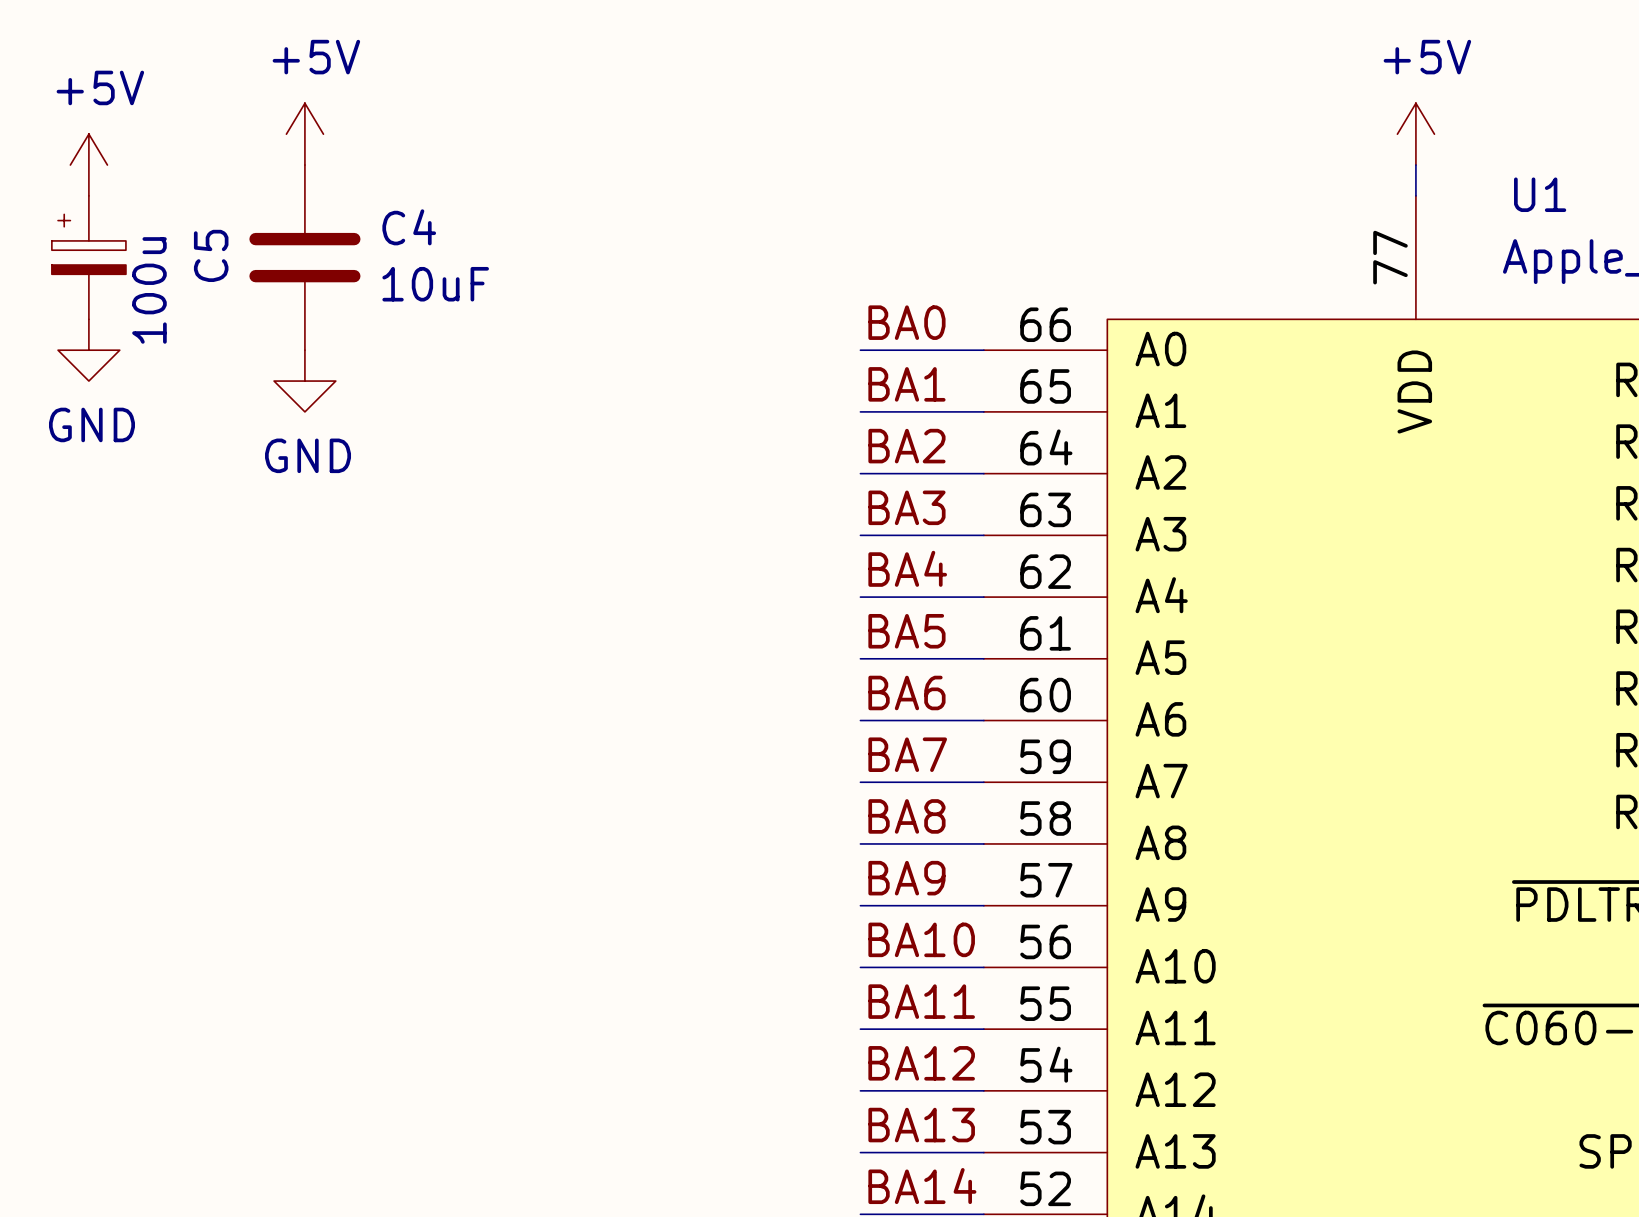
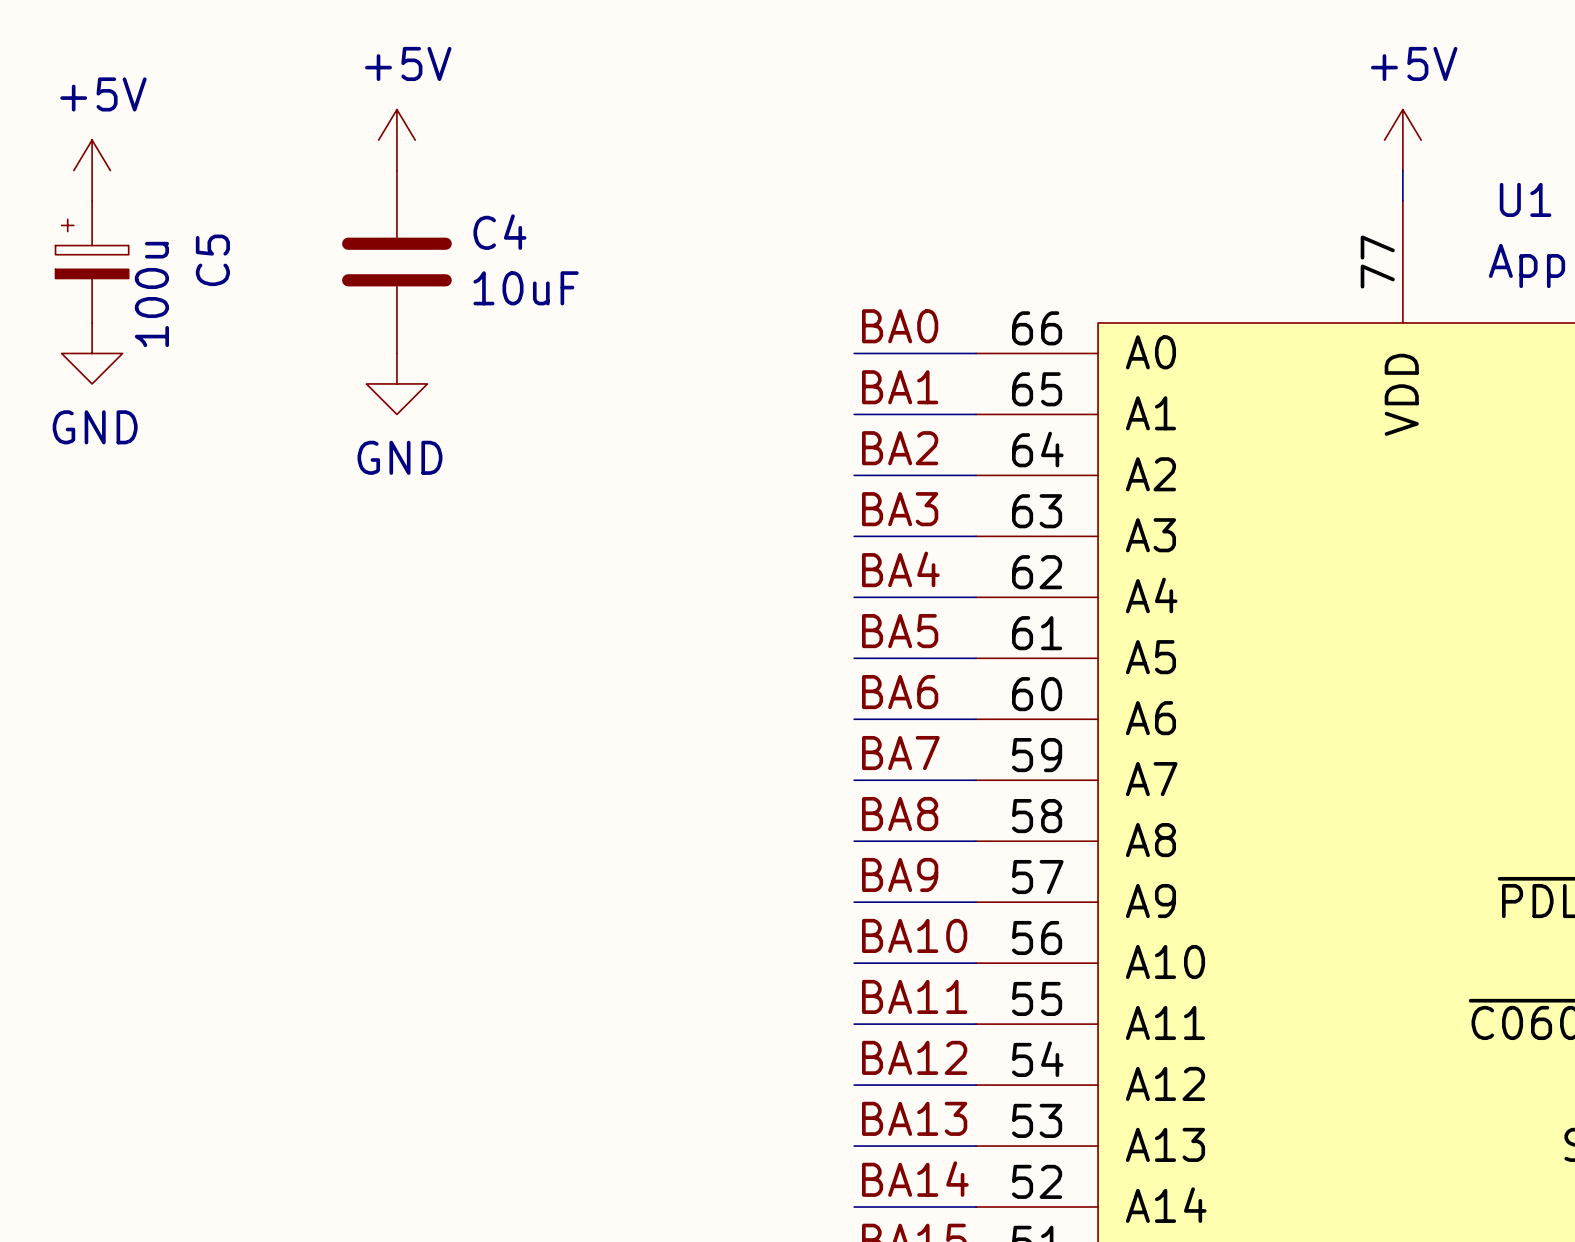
power symbol position: +5V (304, 134) -> +5V (396, 140)
C4 position: (304, 257) -> (396, 262)
power symbol position: GND (304, 381) -> GND (396, 383)

